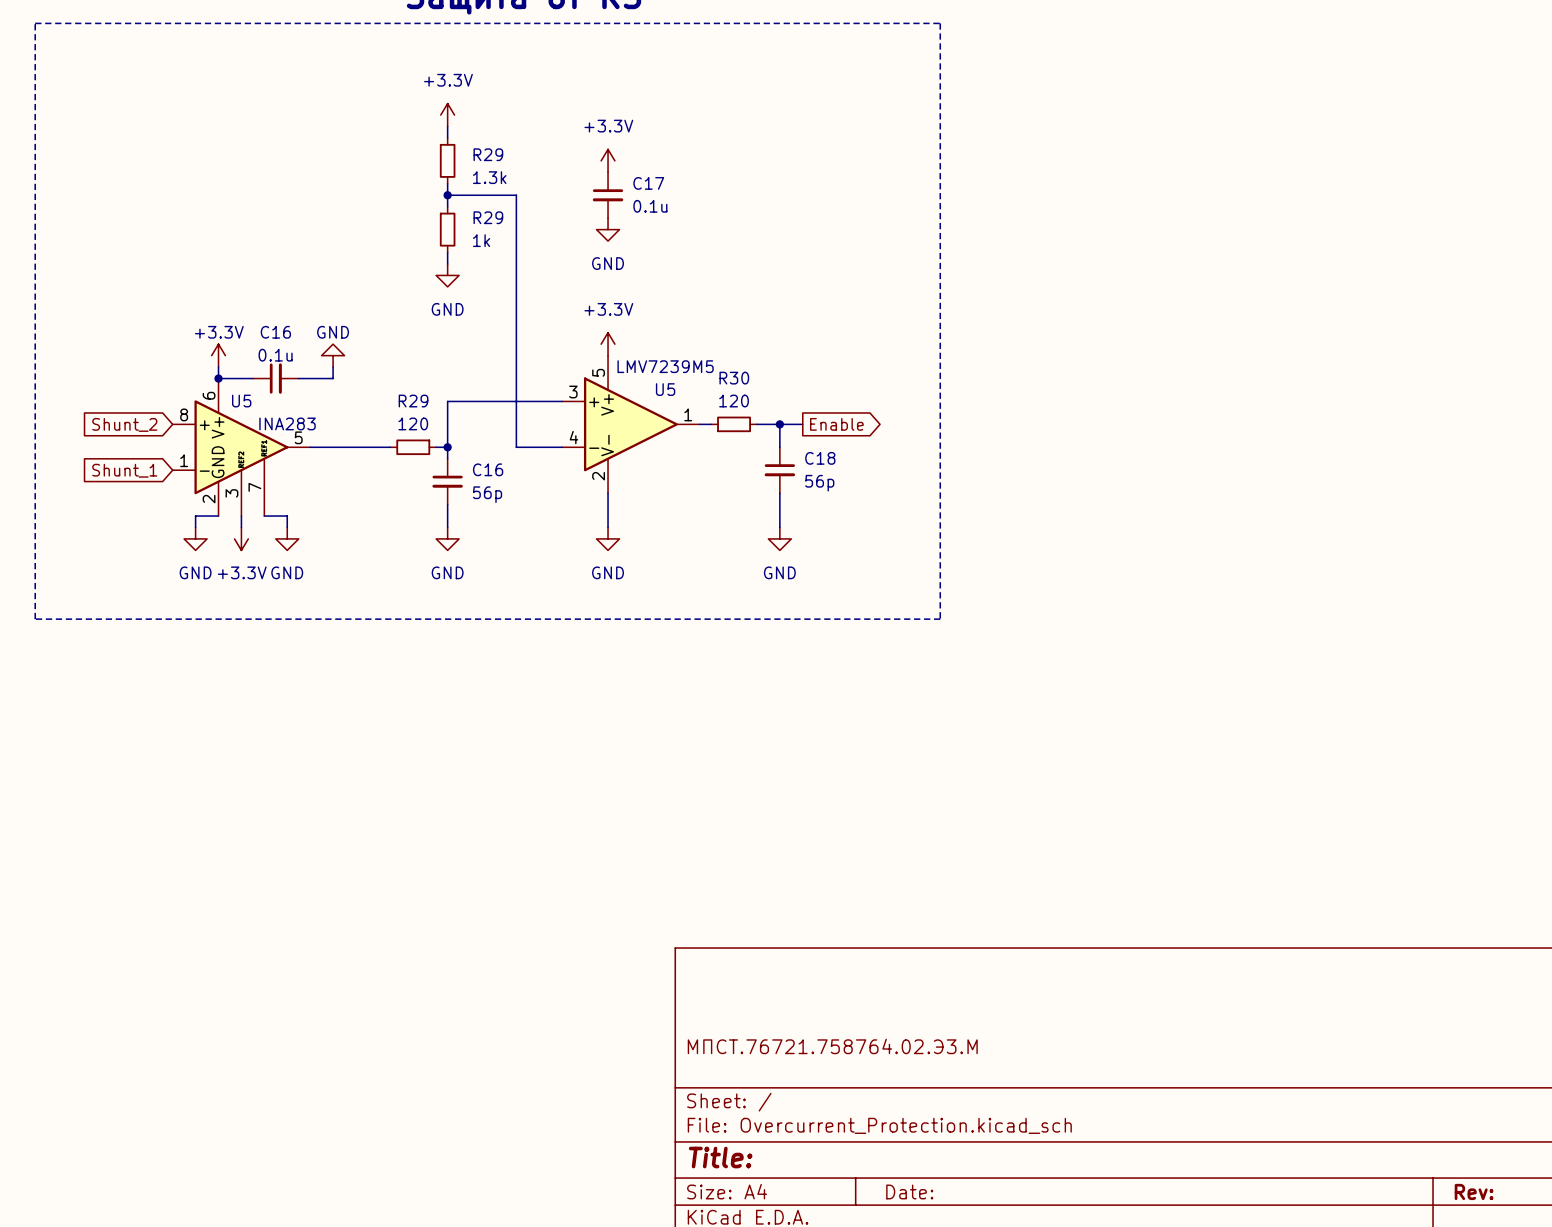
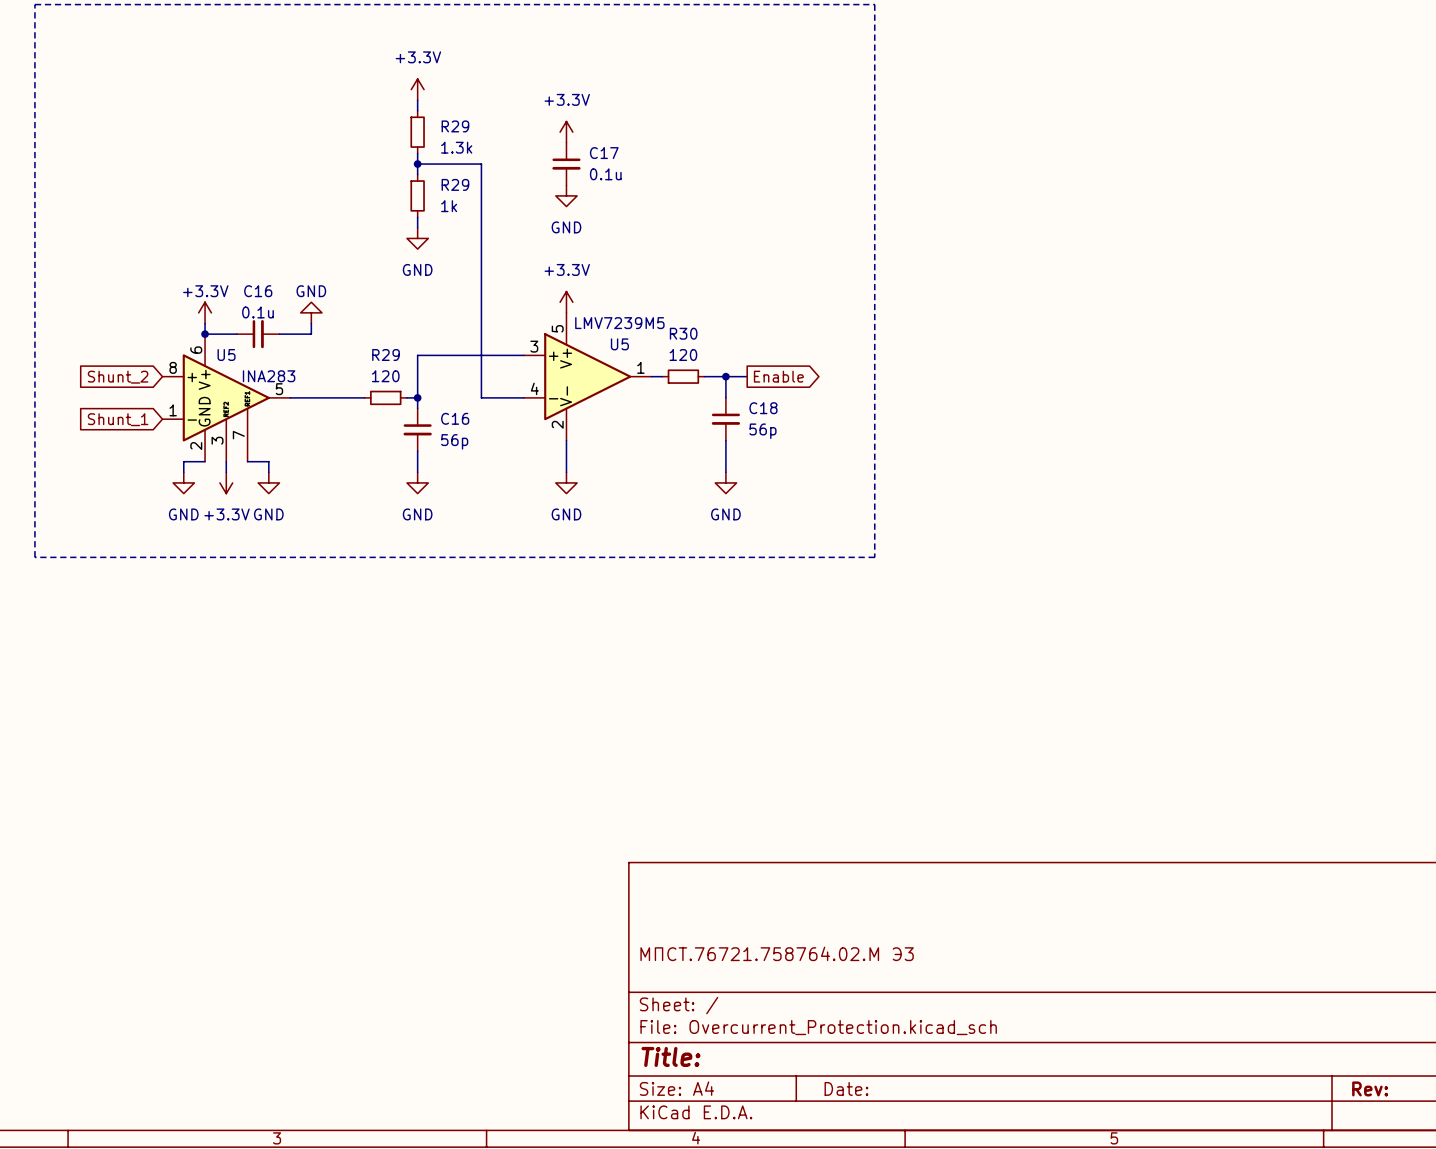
title block: МПСТ.76721.758764.02.Э3.М (832, 1046) -> МПСТ.76721.758764.02.М Э3 (777, 953)

